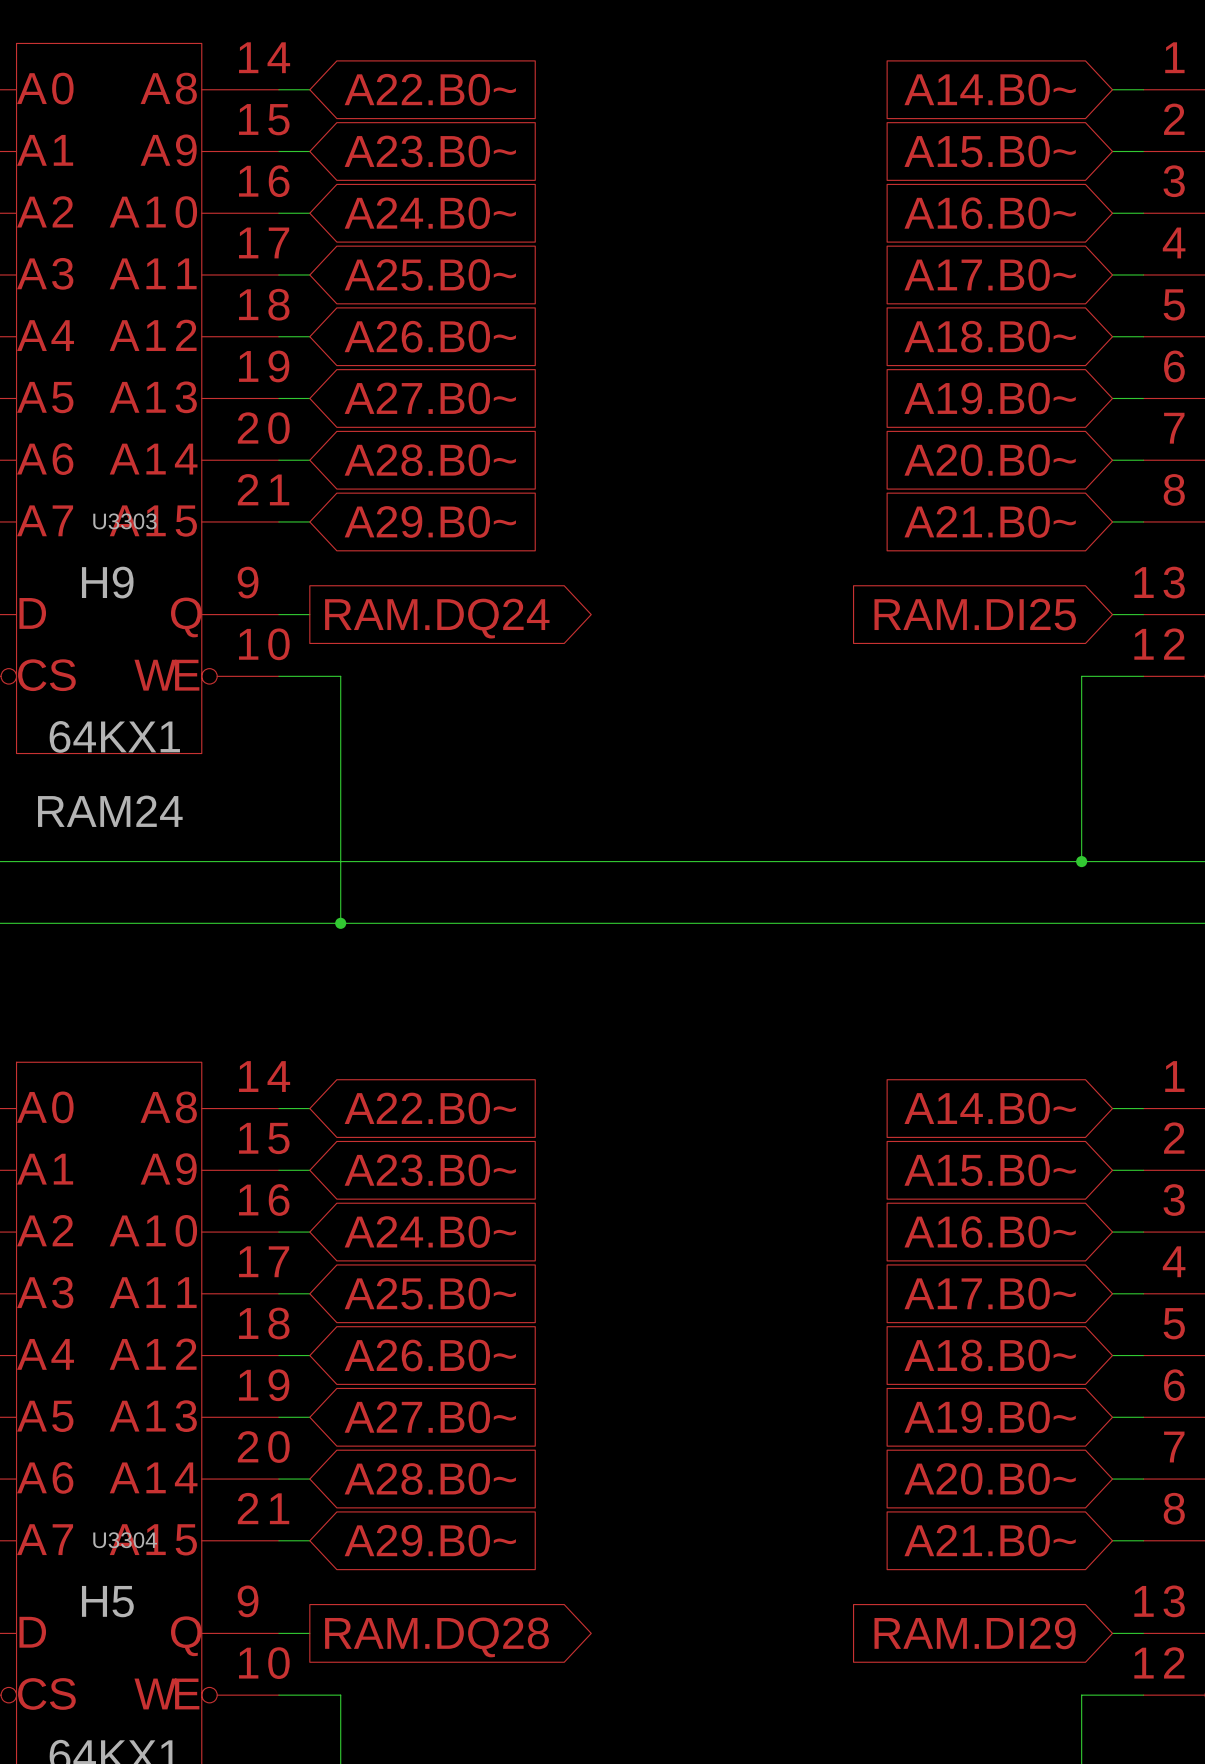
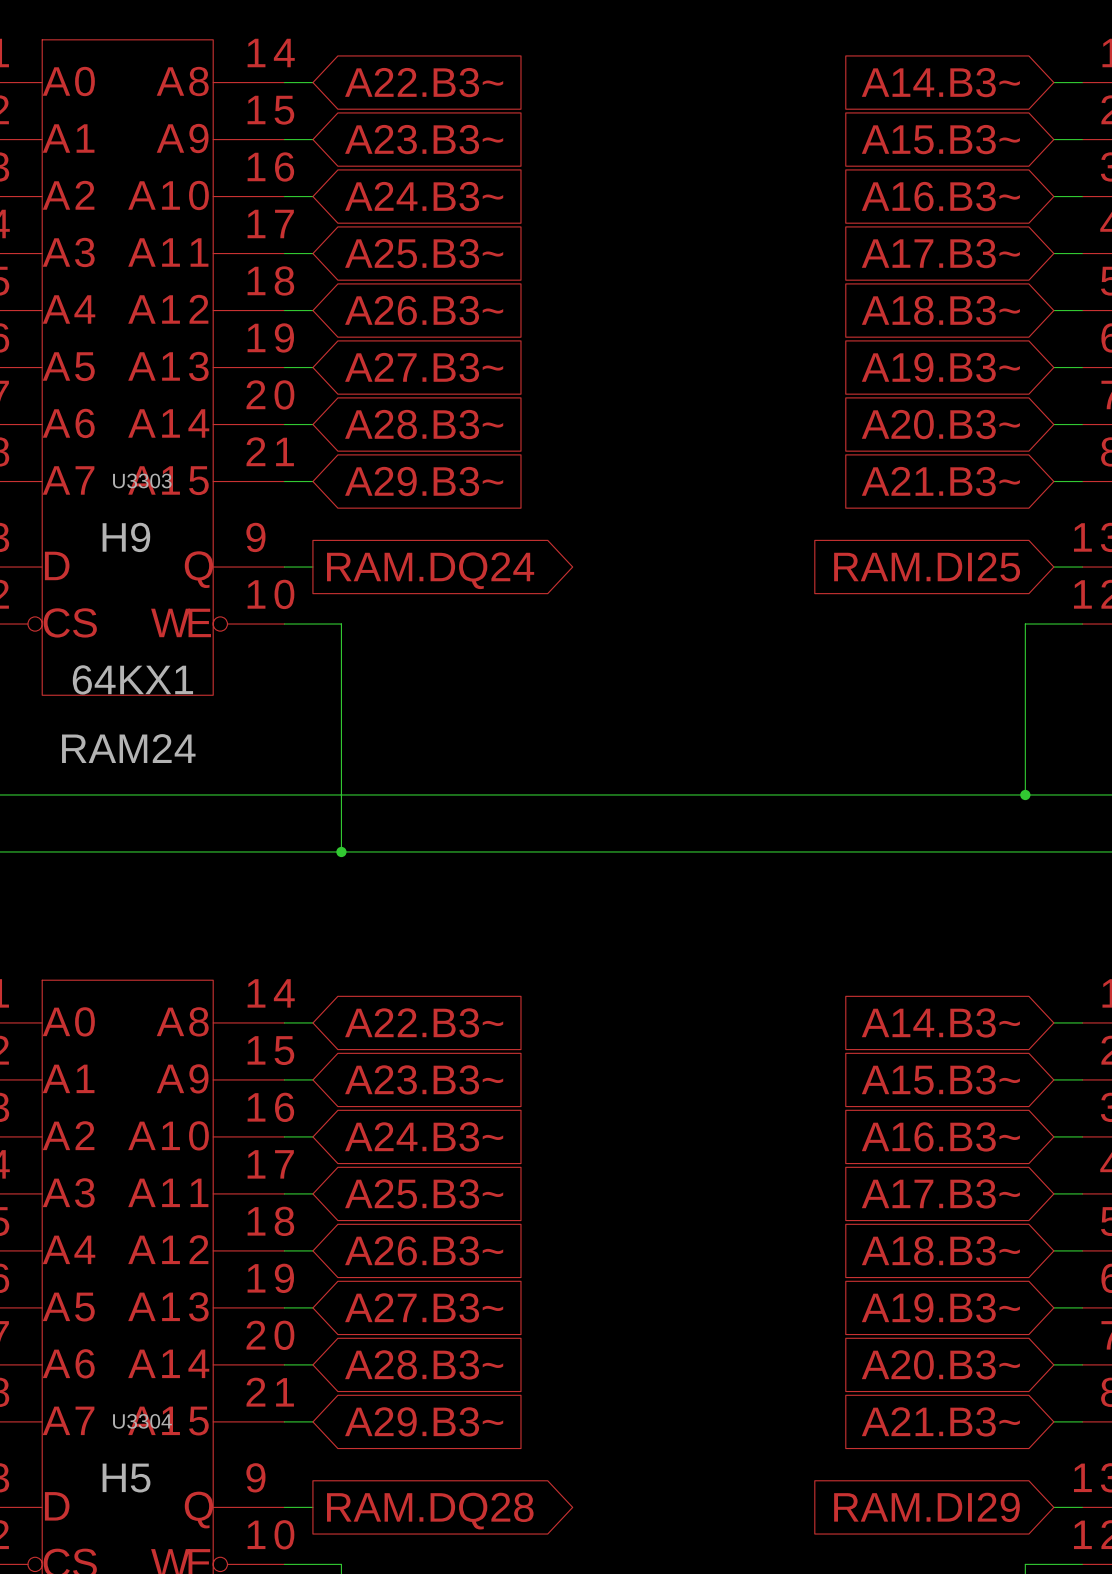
global label: A22.B0~ (430, 89) -> A22.B3~ (424, 82)
global label: A14.B0~ (990, 89) -> A14.B3~ (940, 82)
global label: A23.B0~ (430, 151) -> A23.B3~ (424, 139)
global label: A15.B0~ (990, 151) -> A15.B3~ (940, 139)
global label: A24.B0~ (430, 213) -> A24.B3~ (424, 196)
global label: A16.B0~ (990, 213) -> A16.B3~ (940, 196)
global label: A25.B0~ (430, 274) -> A25.B3~ (424, 253)
global label: A17.B0~ (990, 274) -> A17.B3~ (940, 253)
global label: A26.B0~ (430, 336) -> A26.B3~ (424, 310)
global label: A18.B0~ (990, 336) -> A18.B3~ (940, 310)
global label: A27.B0~ (430, 398) -> A27.B3~ (424, 367)
global label: A19.B0~ (990, 398) -> A19.B3~ (940, 367)
global label: A28.B0~ (430, 460) -> A28.B3~ (424, 424)
global label: A20.B0~ (990, 460) -> A20.B3~ (940, 424)
global label: A29.B0~ (430, 521) -> A29.B3~ (424, 481)
global label: A21.B0~ (990, 521) -> A21.B3~ (940, 481)
global label: A22.B0~ (430, 1108) -> A22.B3~ (424, 1022)
global label: A14.B0~ (990, 1108) -> A14.B3~ (940, 1022)
global label: A23.B0~ (430, 1170) -> A23.B3~ (424, 1079)
global label: A15.B0~ (990, 1170) -> A15.B3~ (940, 1079)
global label: A24.B0~ (430, 1232) -> A24.B3~ (424, 1136)
global label: A16.B0~ (990, 1232) -> A16.B3~ (940, 1136)
global label: A25.B0~ (430, 1293) -> A25.B3~ (424, 1193)
global label: A17.B0~ (990, 1293) -> A17.B3~ (940, 1193)
global label: A26.B0~ (430, 1355) -> A26.B3~ (424, 1250)
global label: A18.B0~ (990, 1355) -> A18.B3~ (940, 1250)
global label: A27.B0~ (430, 1417) -> A27.B3~ (424, 1307)
global label: A19.B0~ (990, 1417) -> A19.B3~ (940, 1307)
global label: A28.B0~ (430, 1479) -> A28.B3~ (424, 1364)
global label: A20.B0~ (990, 1479) -> A20.B3~ (940, 1364)
global label: A29.B0~ (430, 1540) -> A29.B3~ (424, 1421)
global label: A21.B0~ (990, 1540) -> A21.B3~ (940, 1421)

